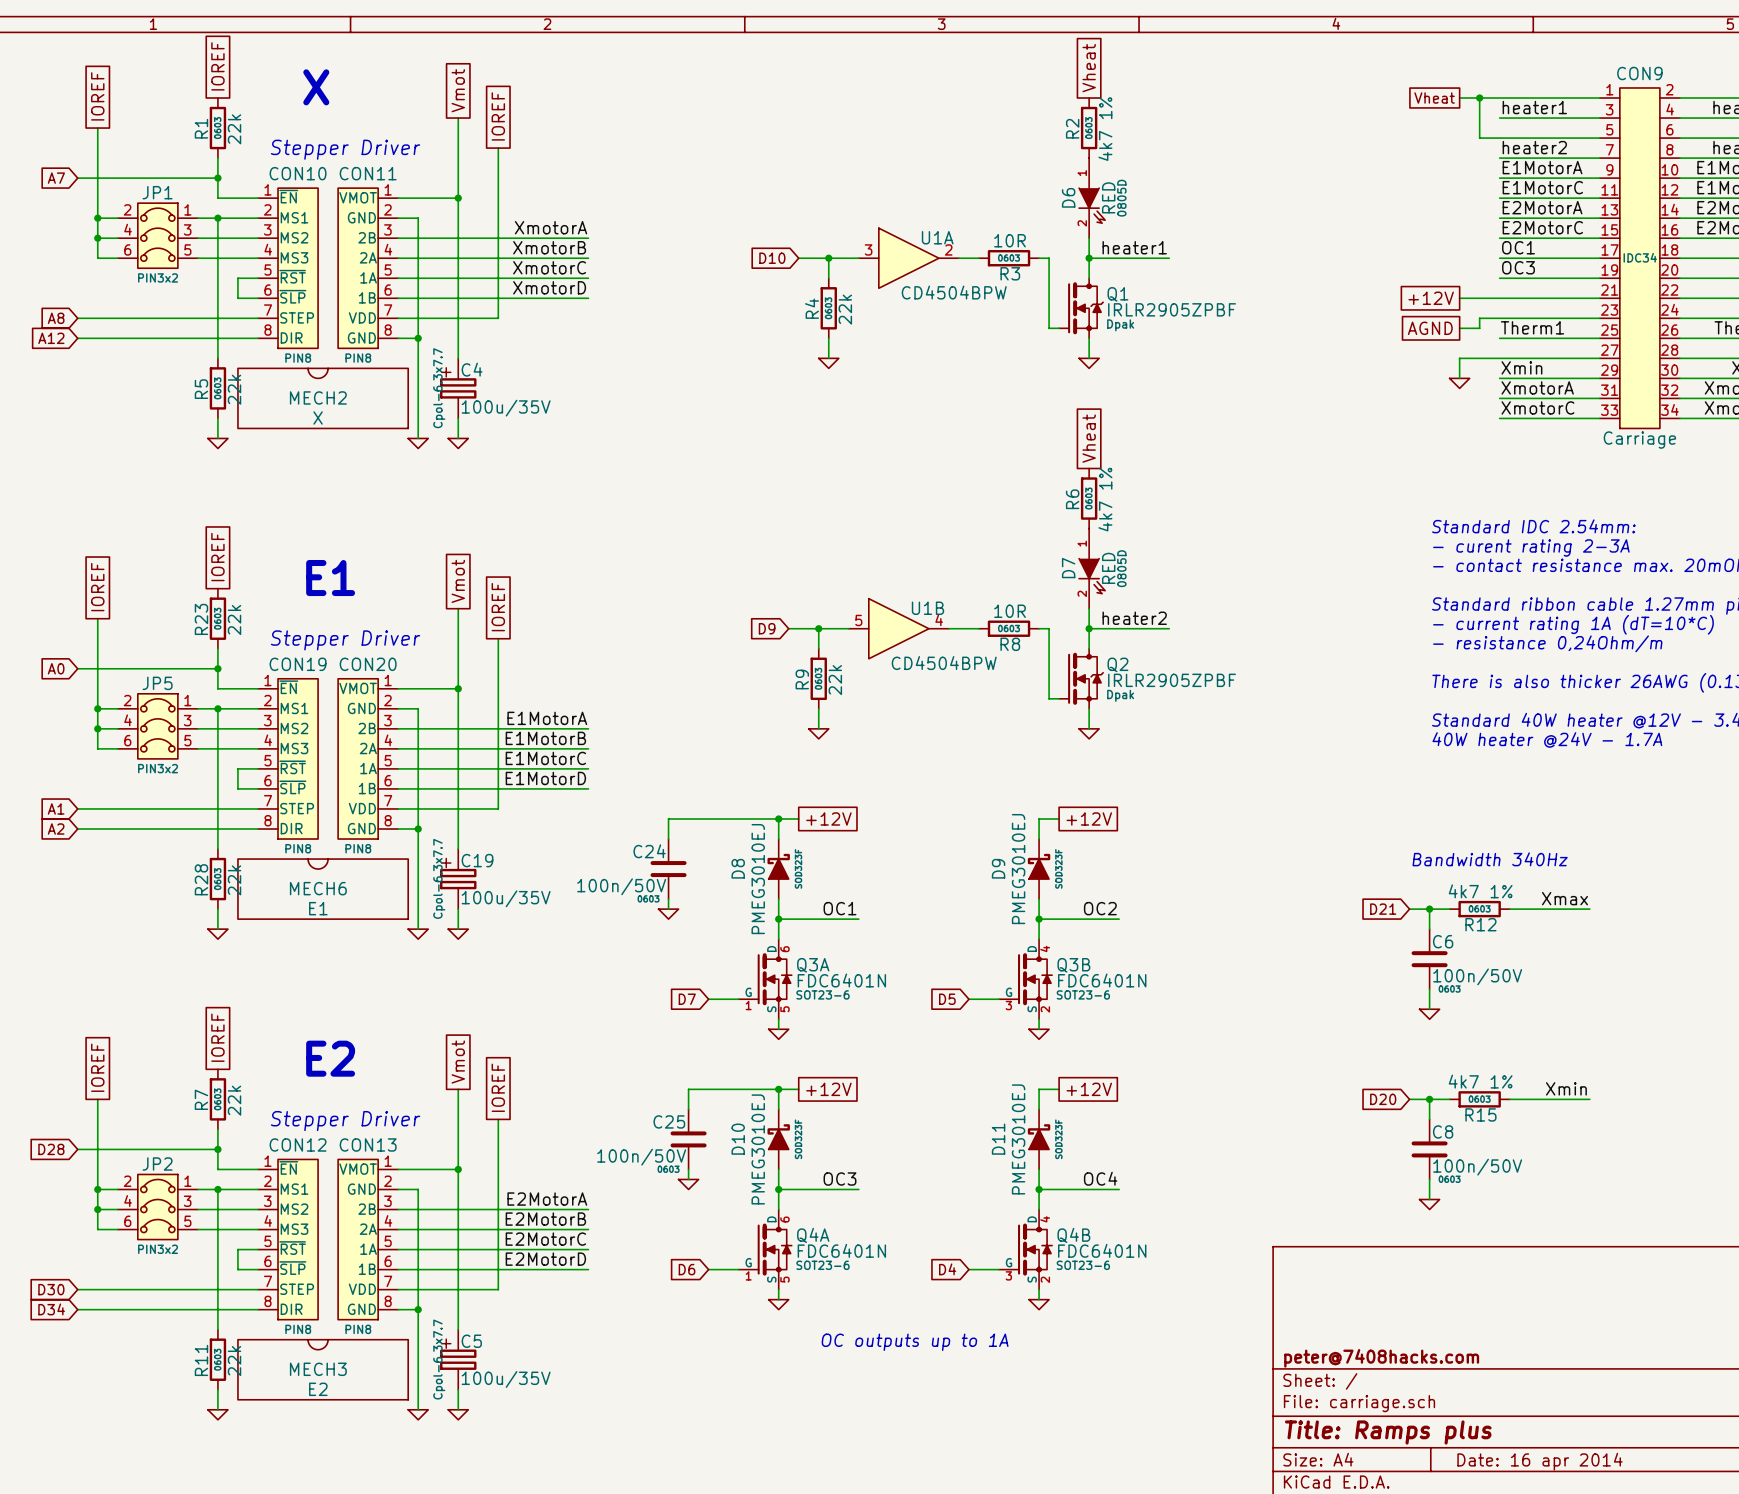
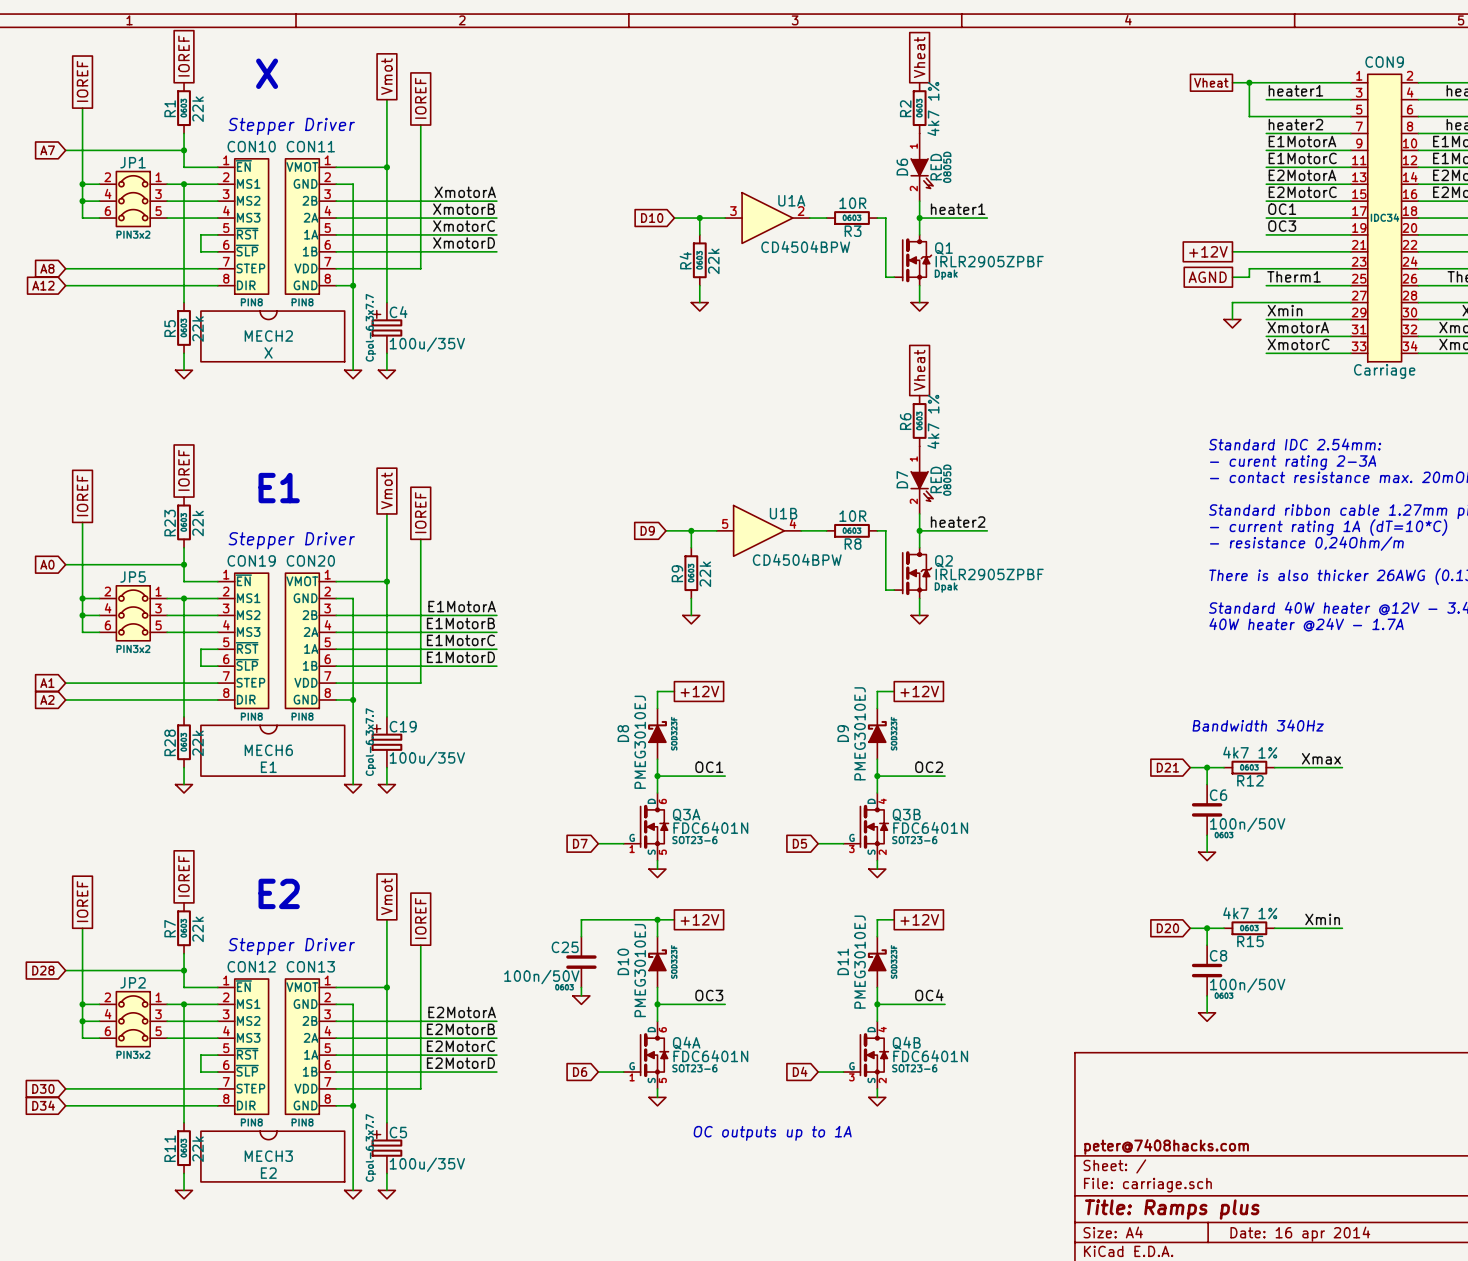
wire: (778, 818) (668, 818) (668, 839) -> none
junction: (778, 818) -> none
C24: 100n/50V (668, 869) -> none
wire: (668, 899) (668, 909) -> none
power symbol: (668, 914) -> none

